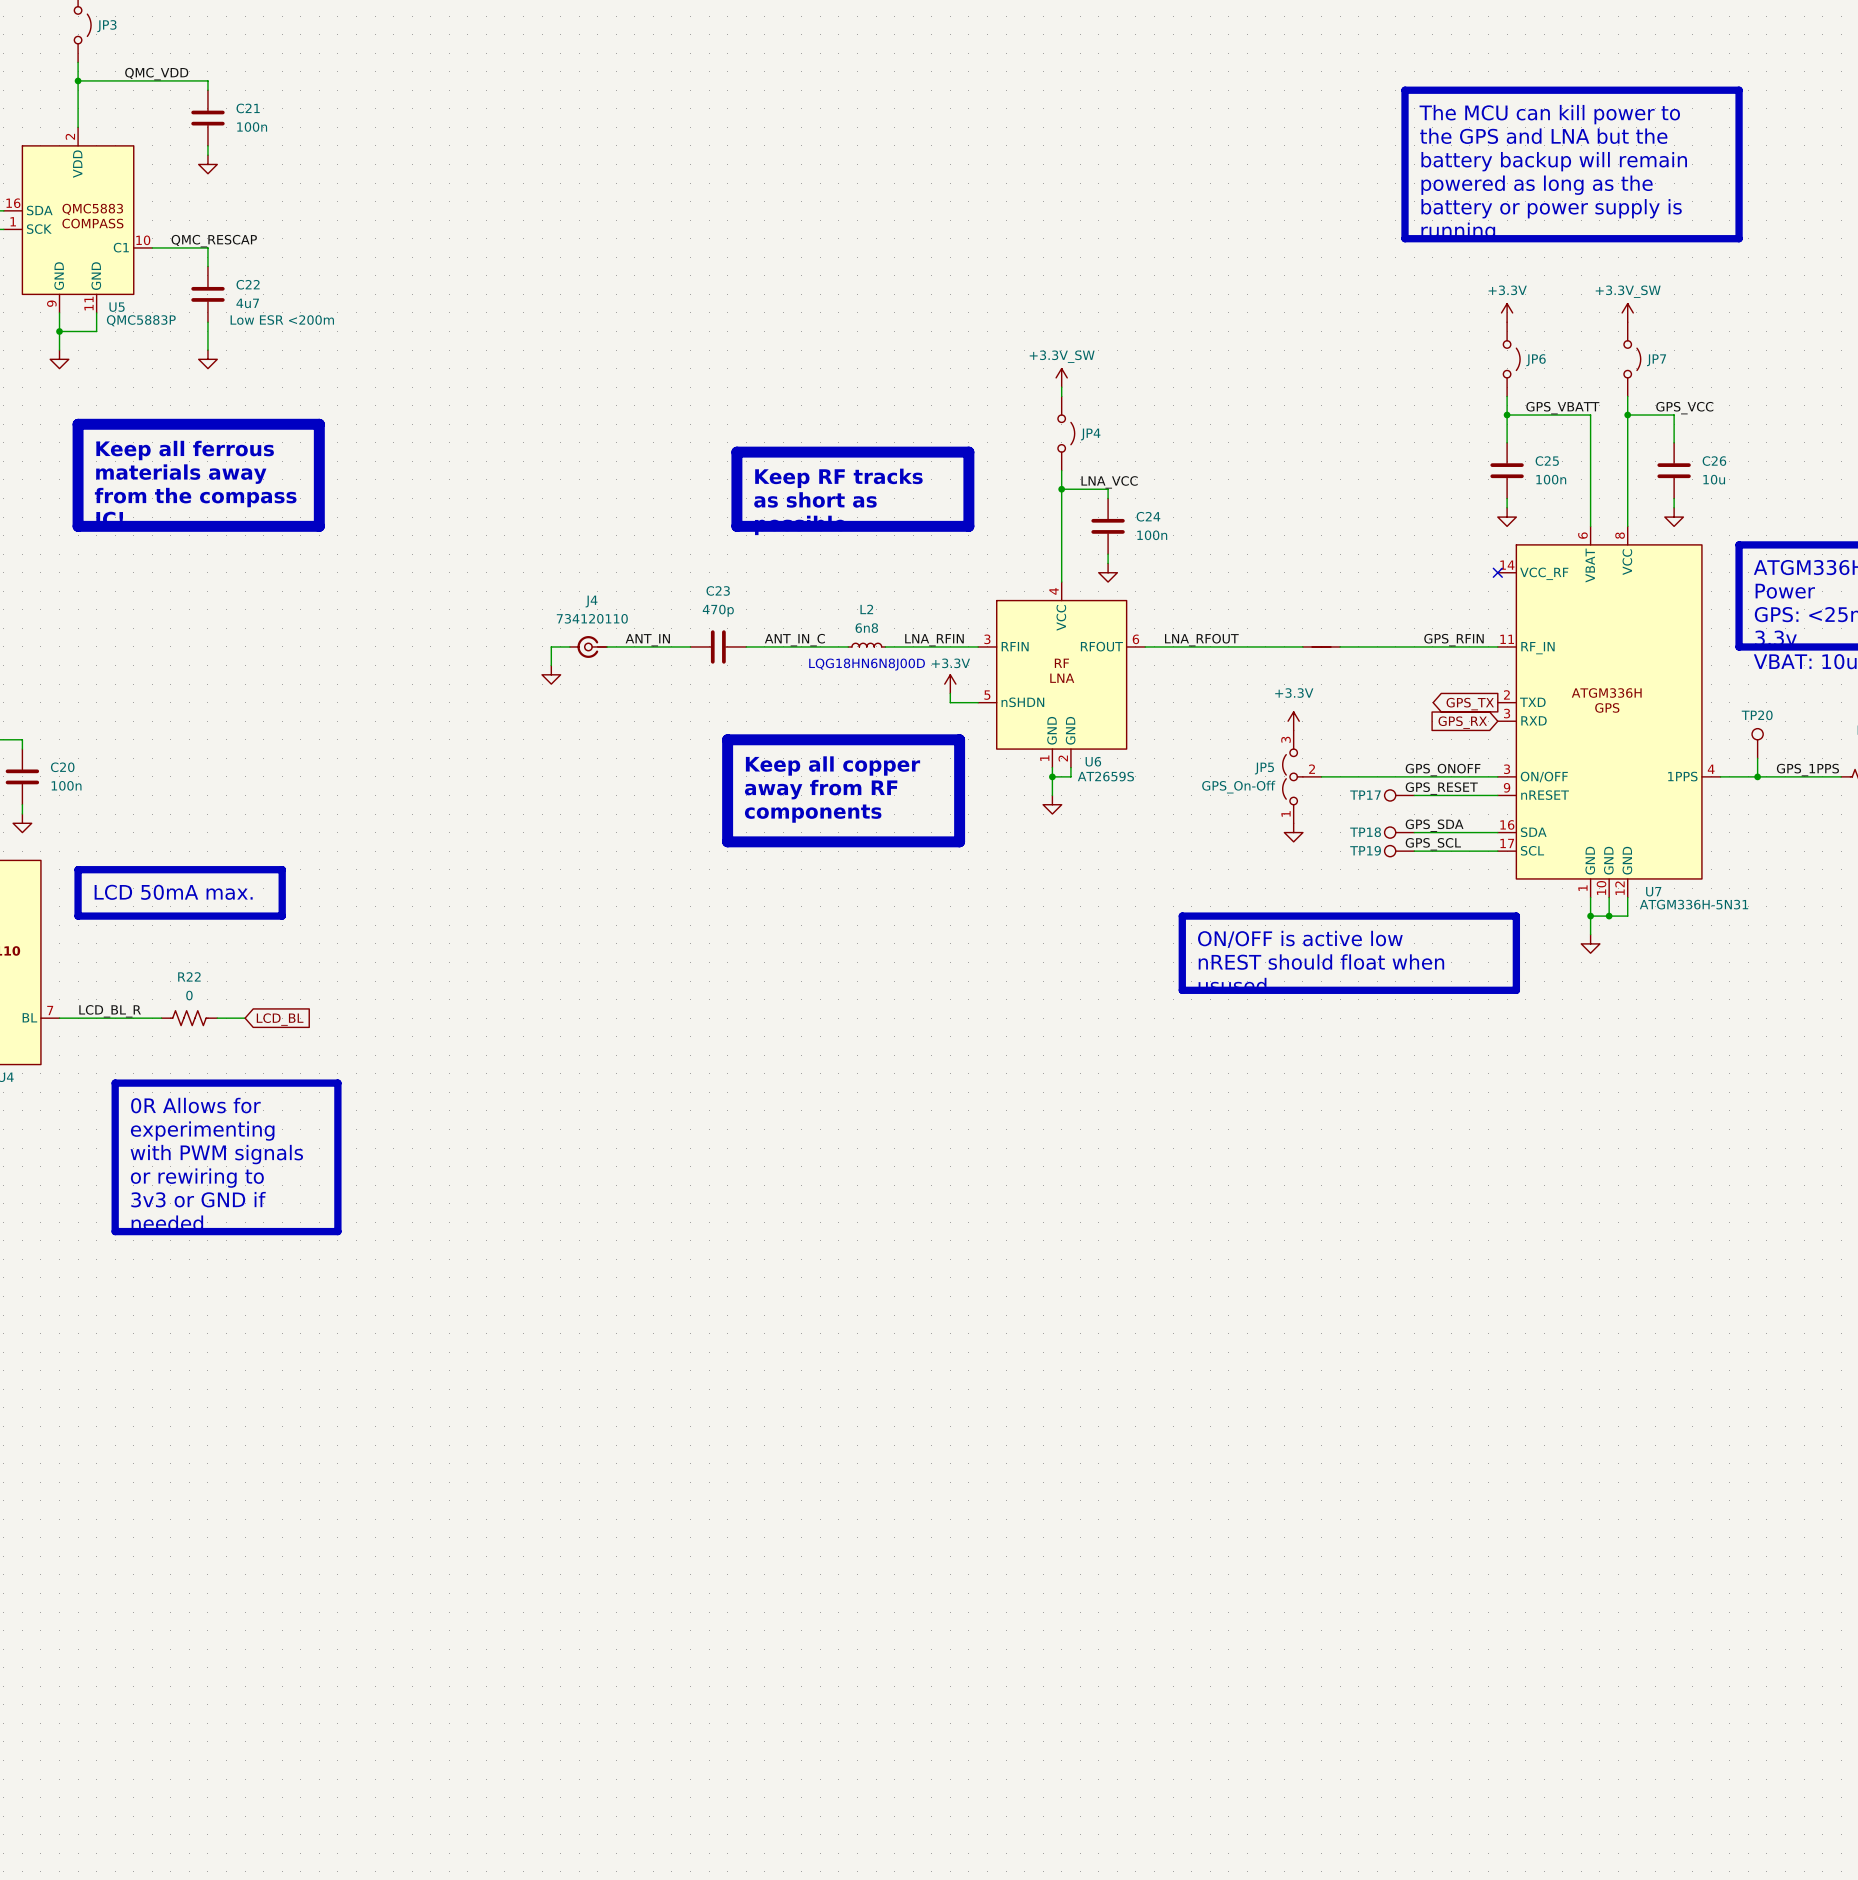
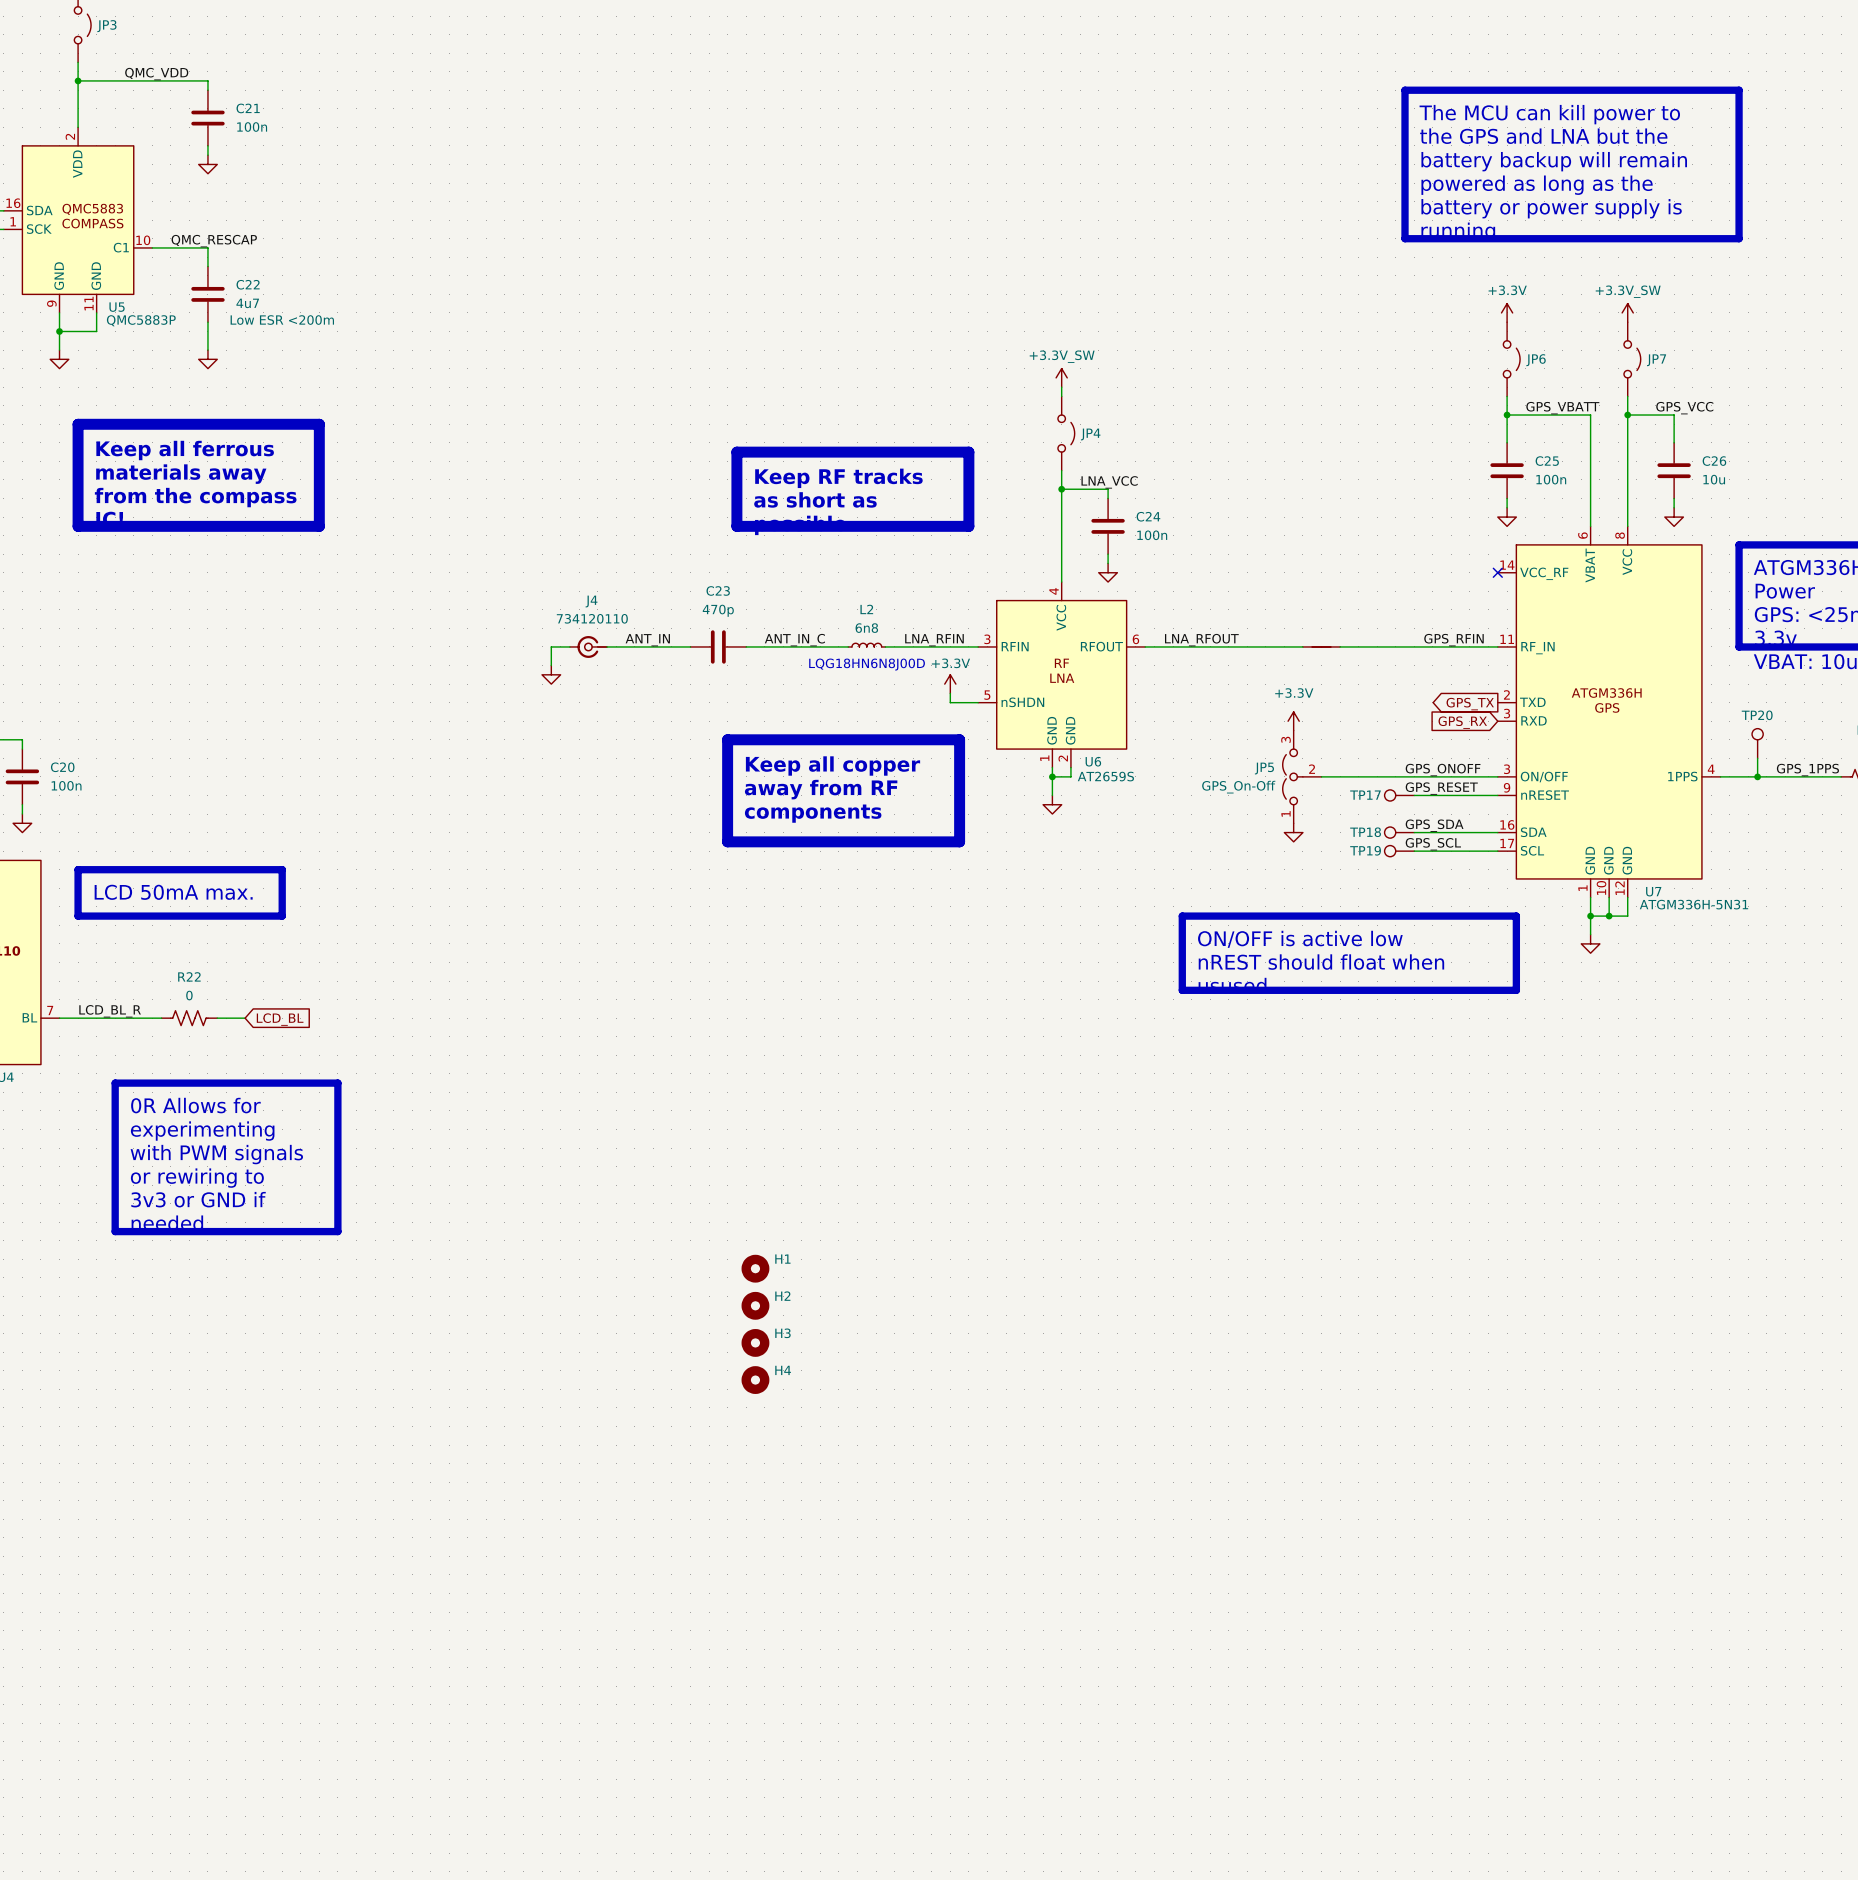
H1: none -> (755, 1268)
H2: none -> (755, 1305)
H3: none -> (755, 1342)
H4: none -> (755, 1380)

